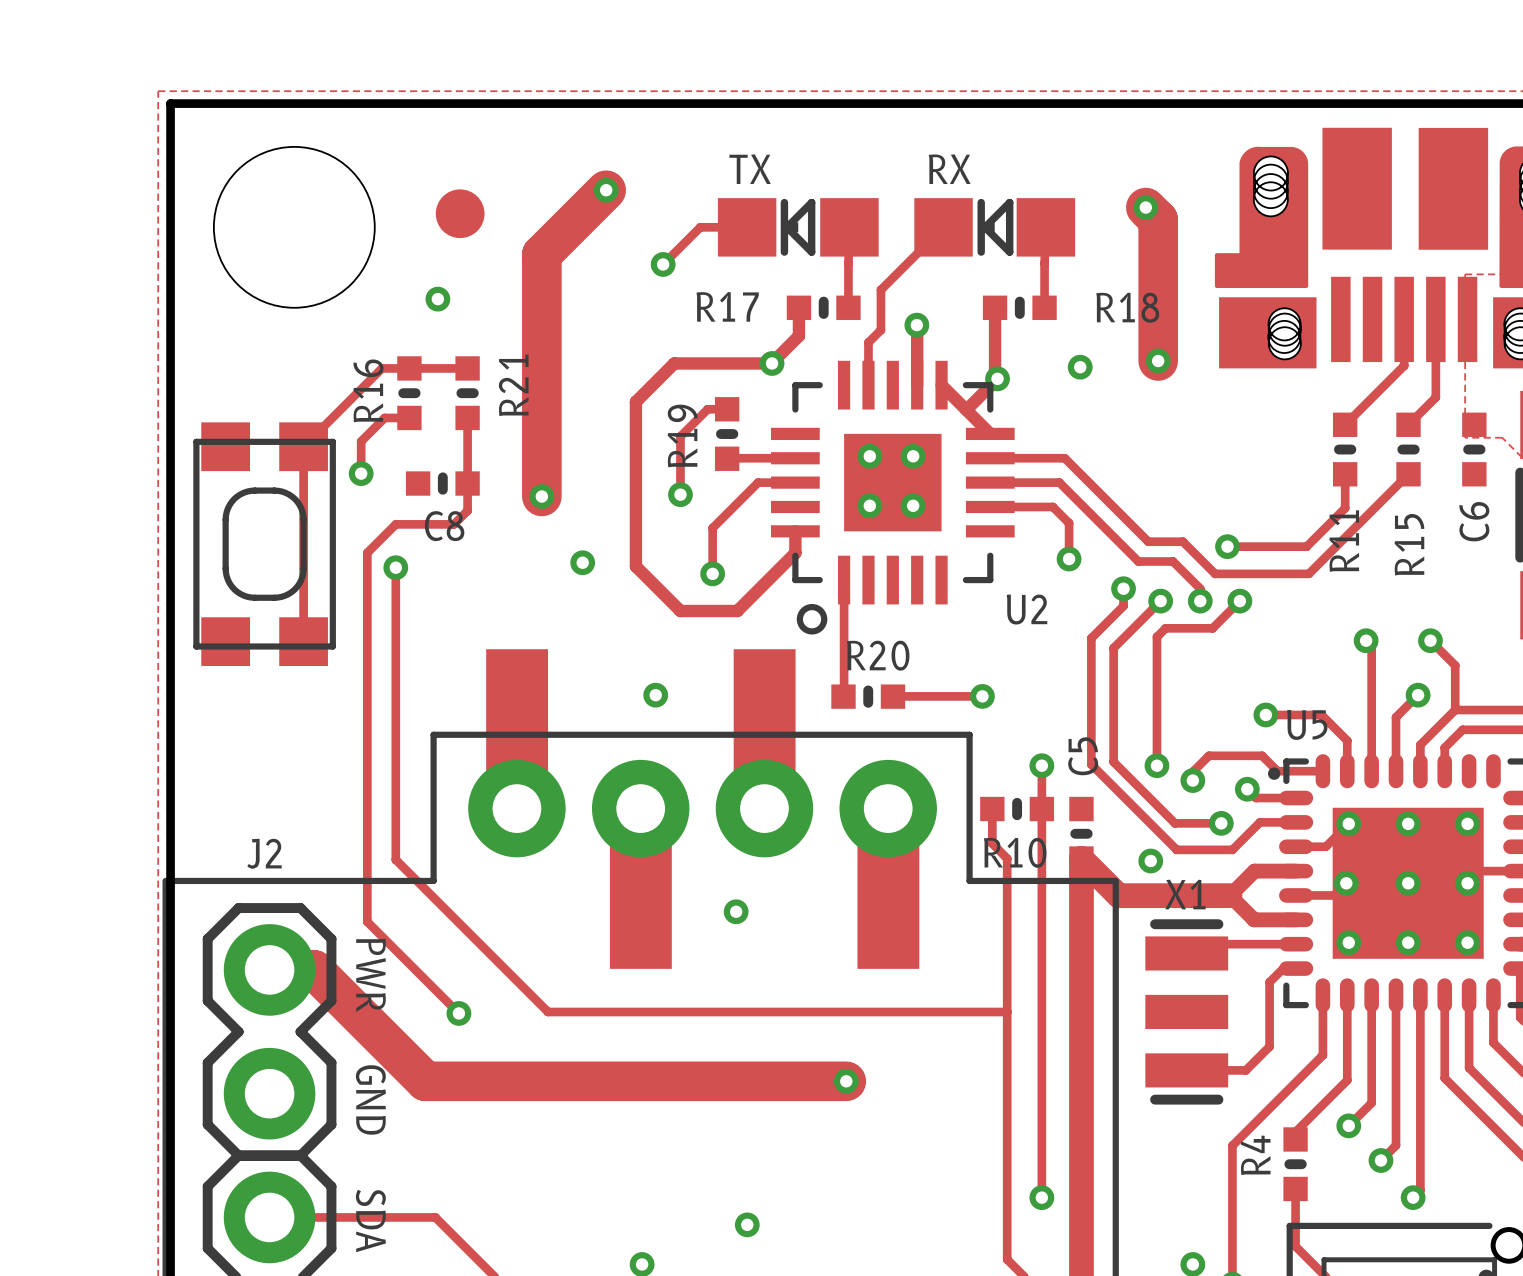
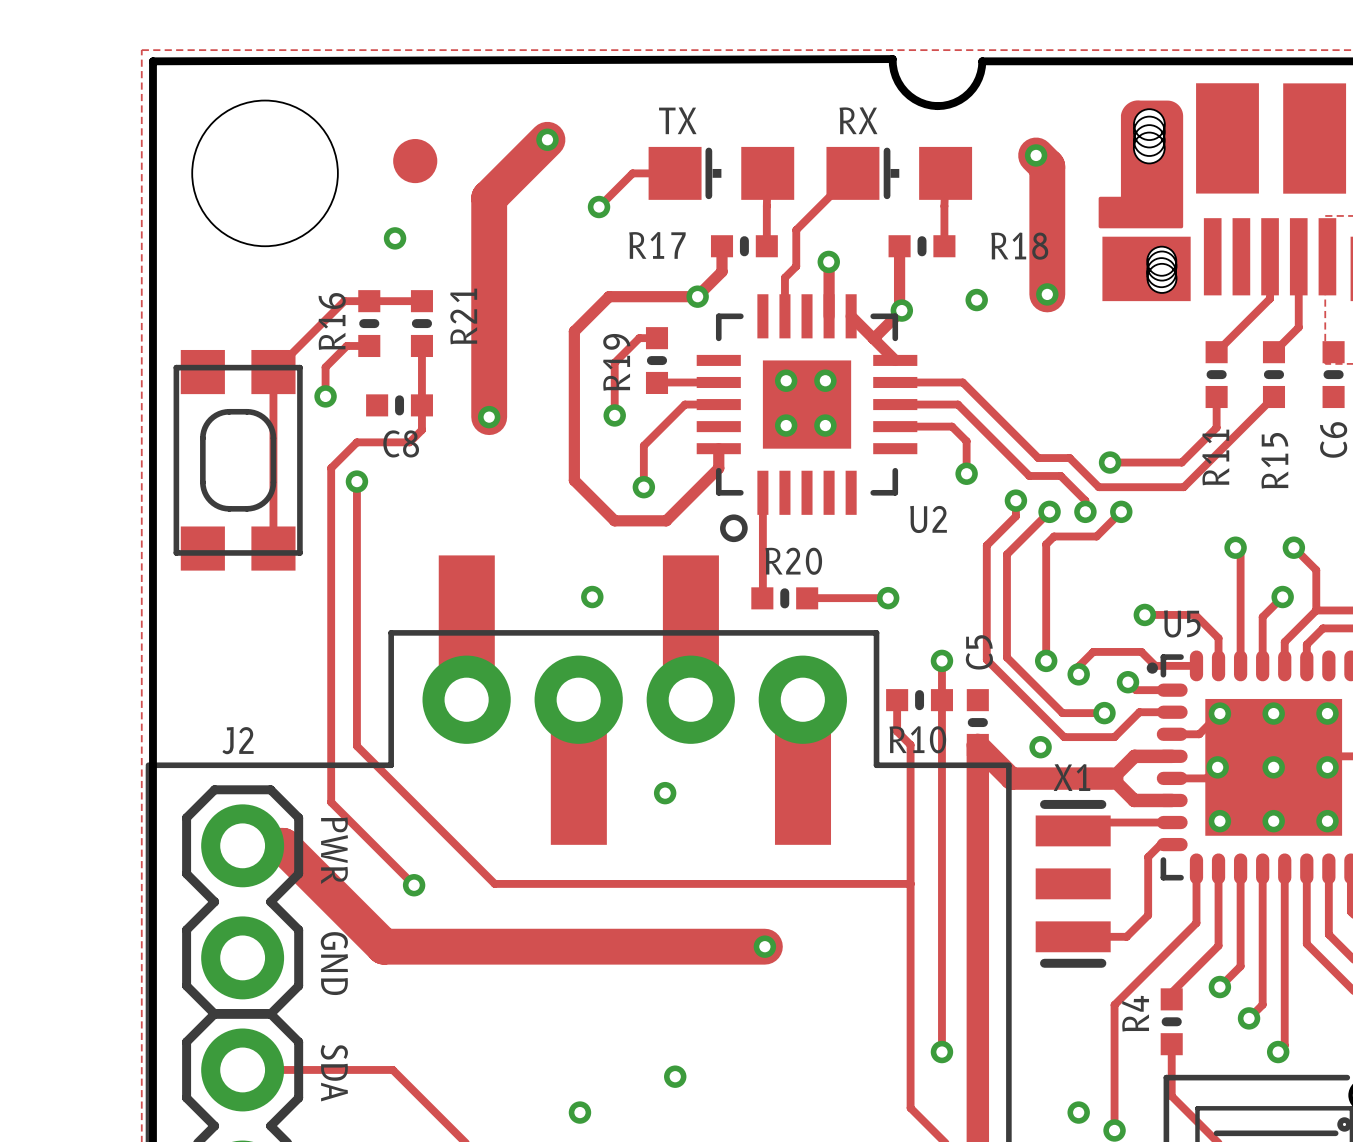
board edge: (170, 103) (1086, 103) -> (152, 61) (892, 59) (895, 76) (905, 91) (919, 102) (937, 106) (954, 102) (969, 93) (978, 78) (982, 61)
line: (811, 202) (786, 227) (811, 252) (811, 202) -> none
line: (1009, 202) (984, 227) (1009, 252) (1009, 202) -> none
via: (582, 562) -> none

